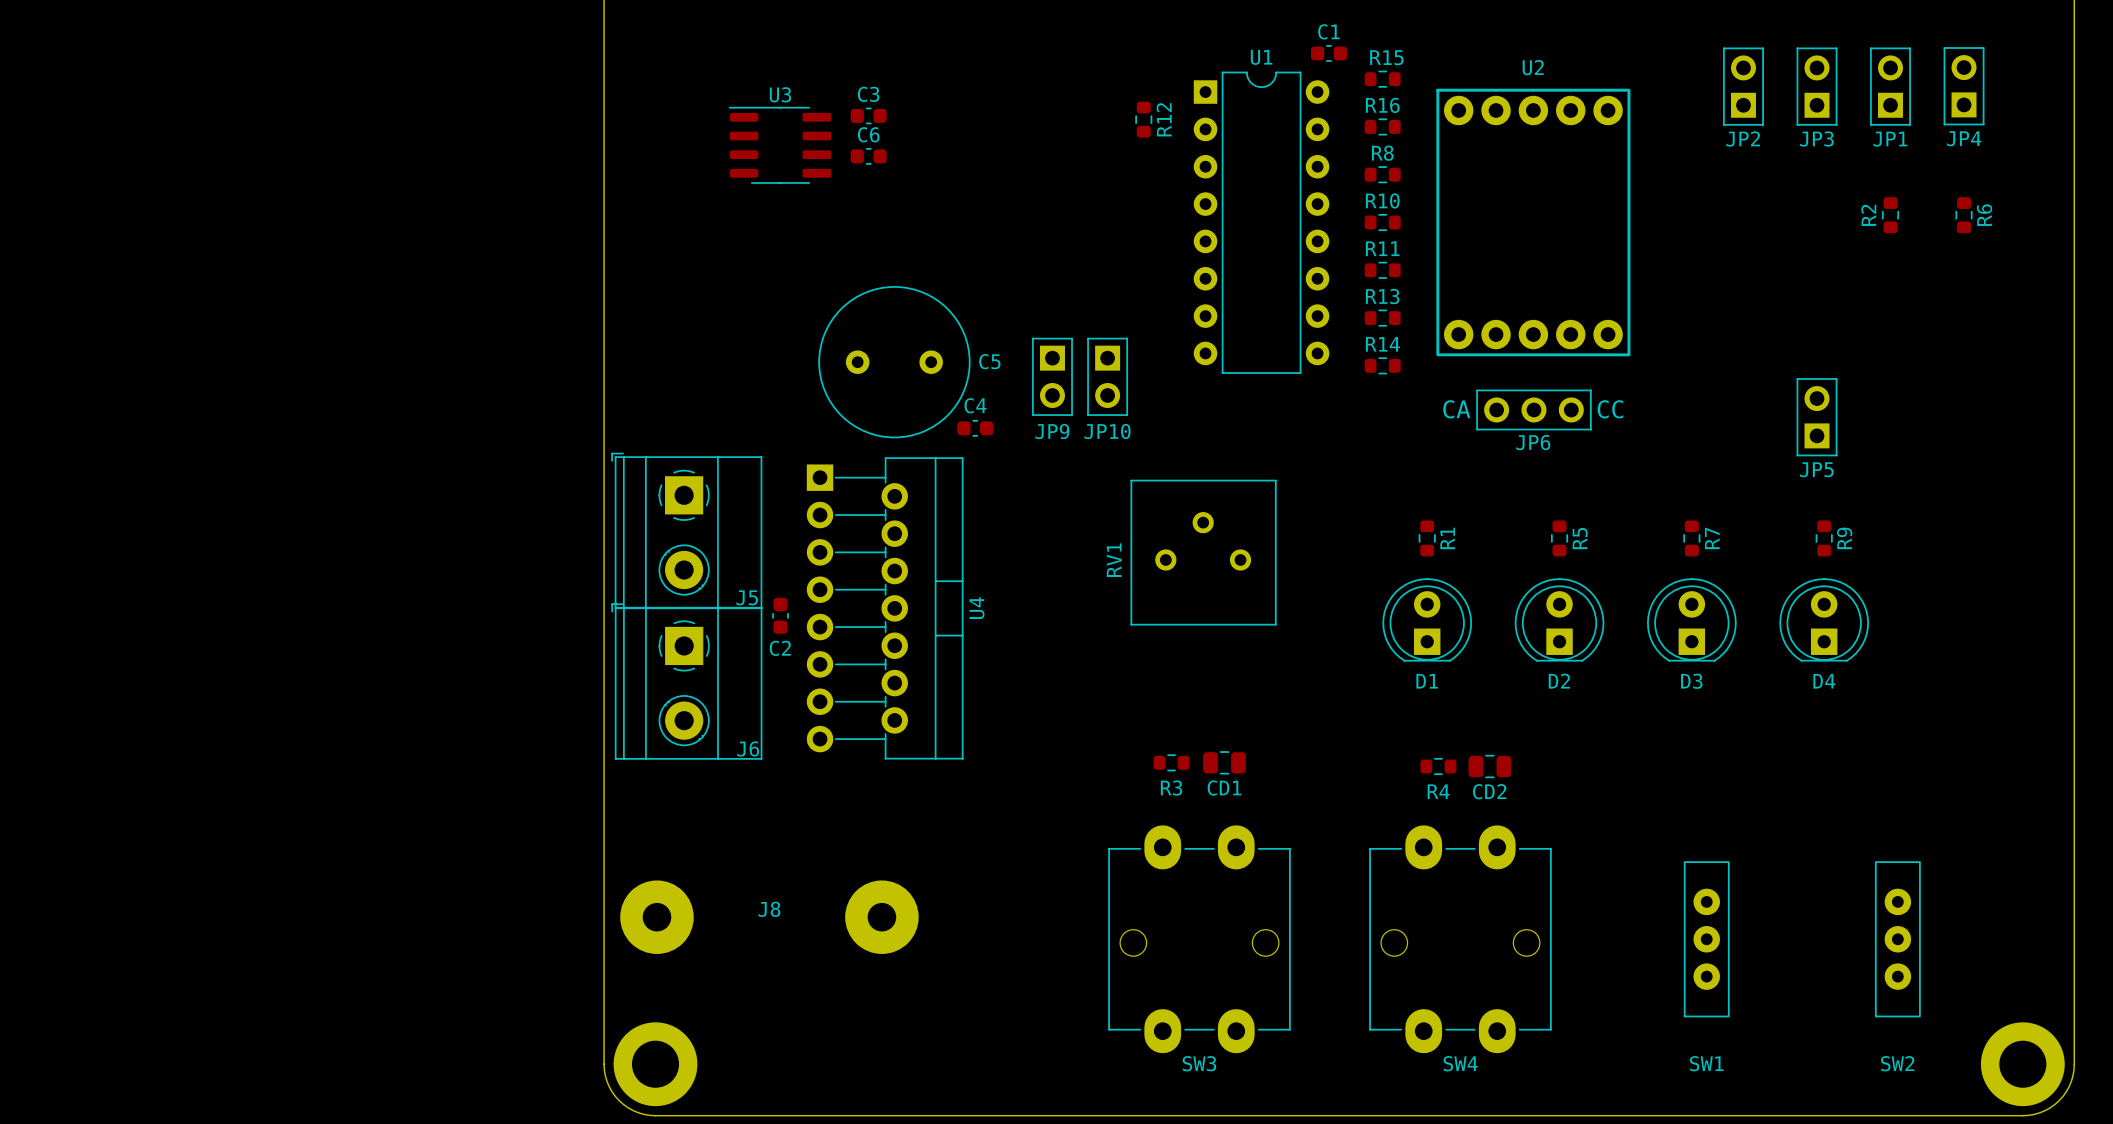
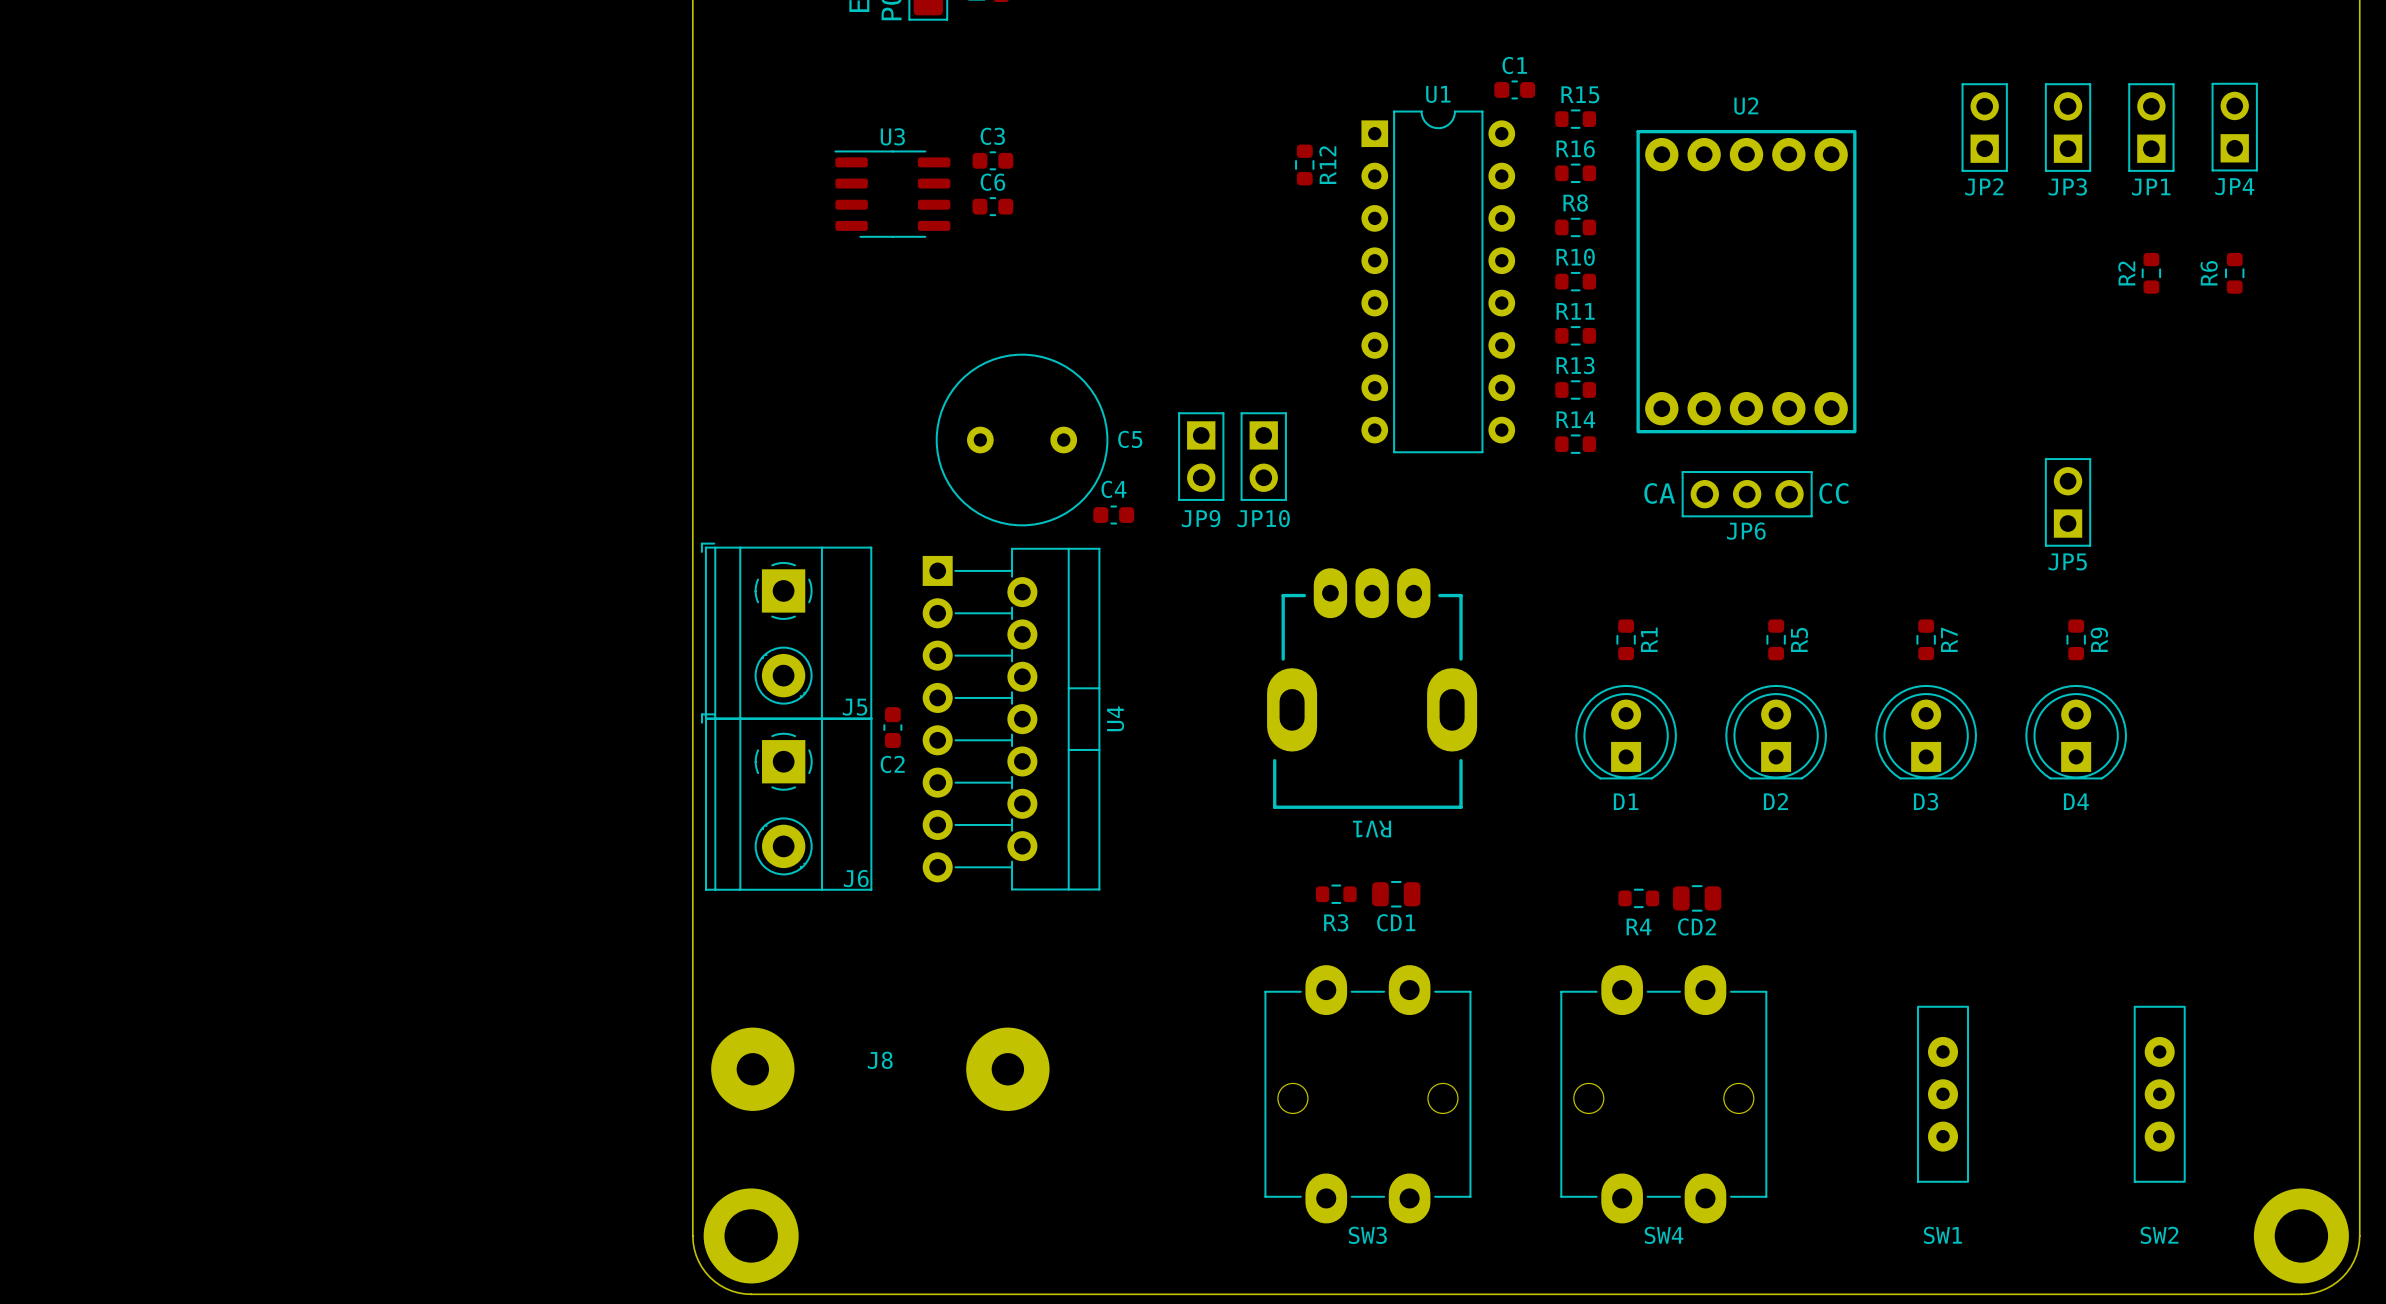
R6 name position: R6 (1984, 215) -> R6 (2209, 273)
RV1 footprint: [1130, 479, 1277, 626] -> [1267, 568, 1478, 809]
RV1 name position: RV1 (1114, 560) -> RV1 (1372, 829)

